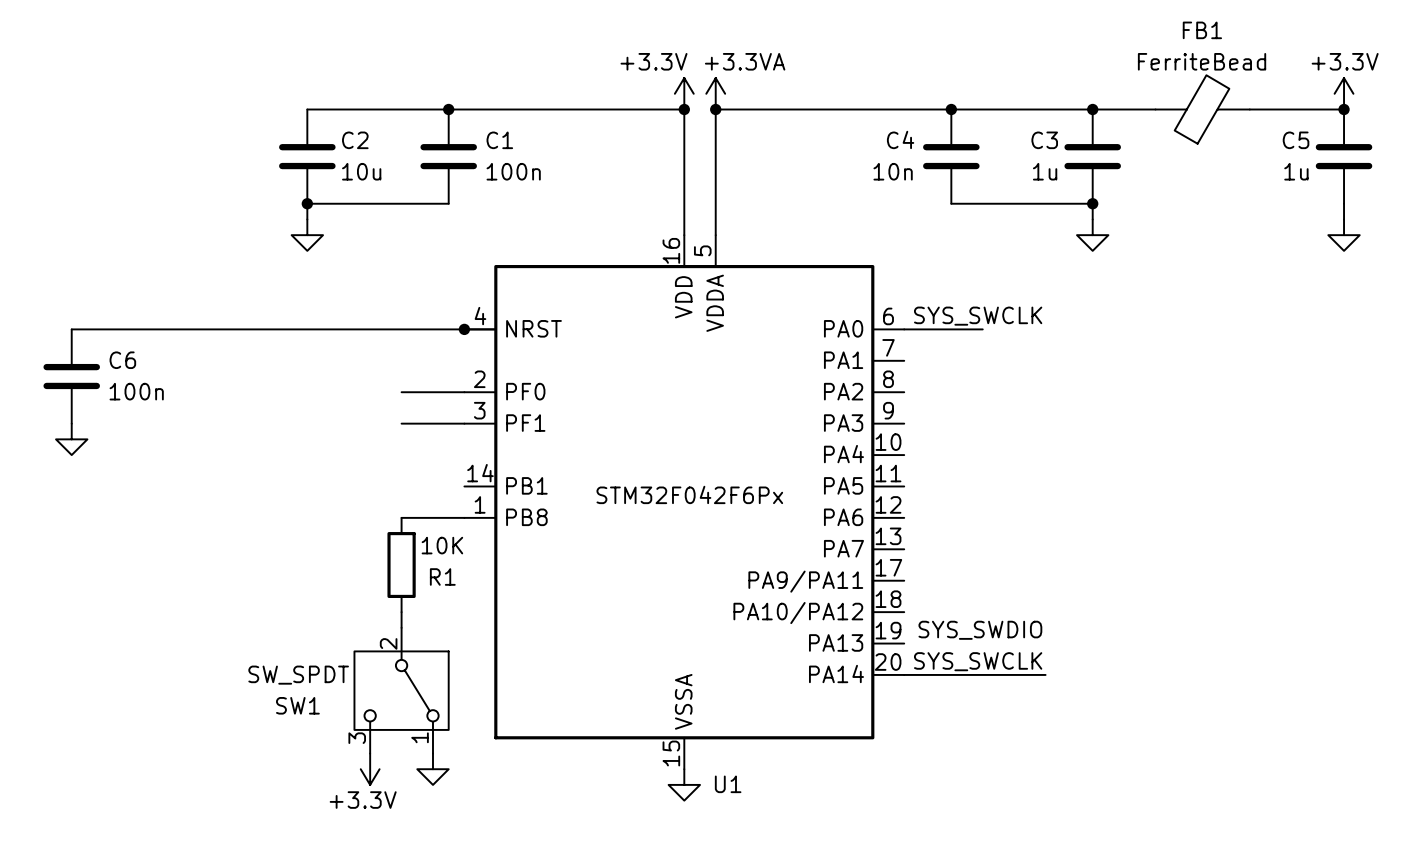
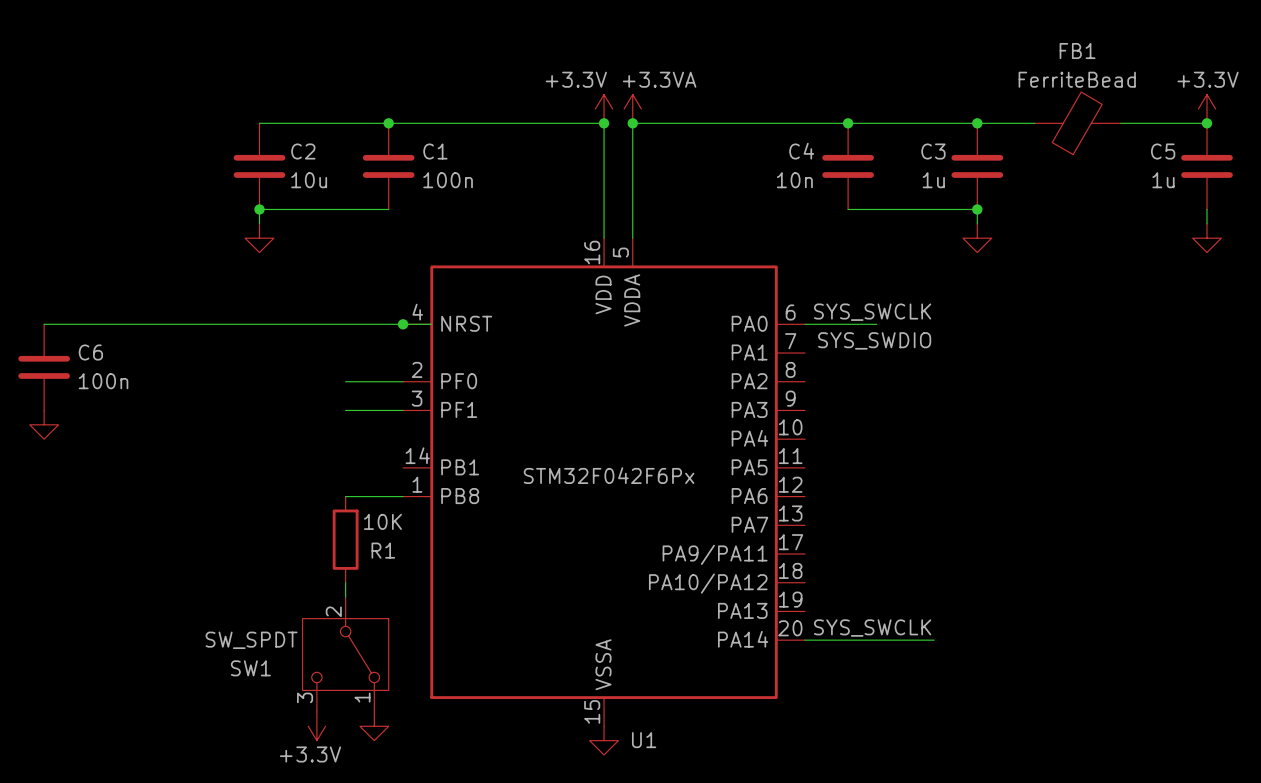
label position: SYS_SWDIO (980, 630) -> SYS_SWDIO (874, 340)

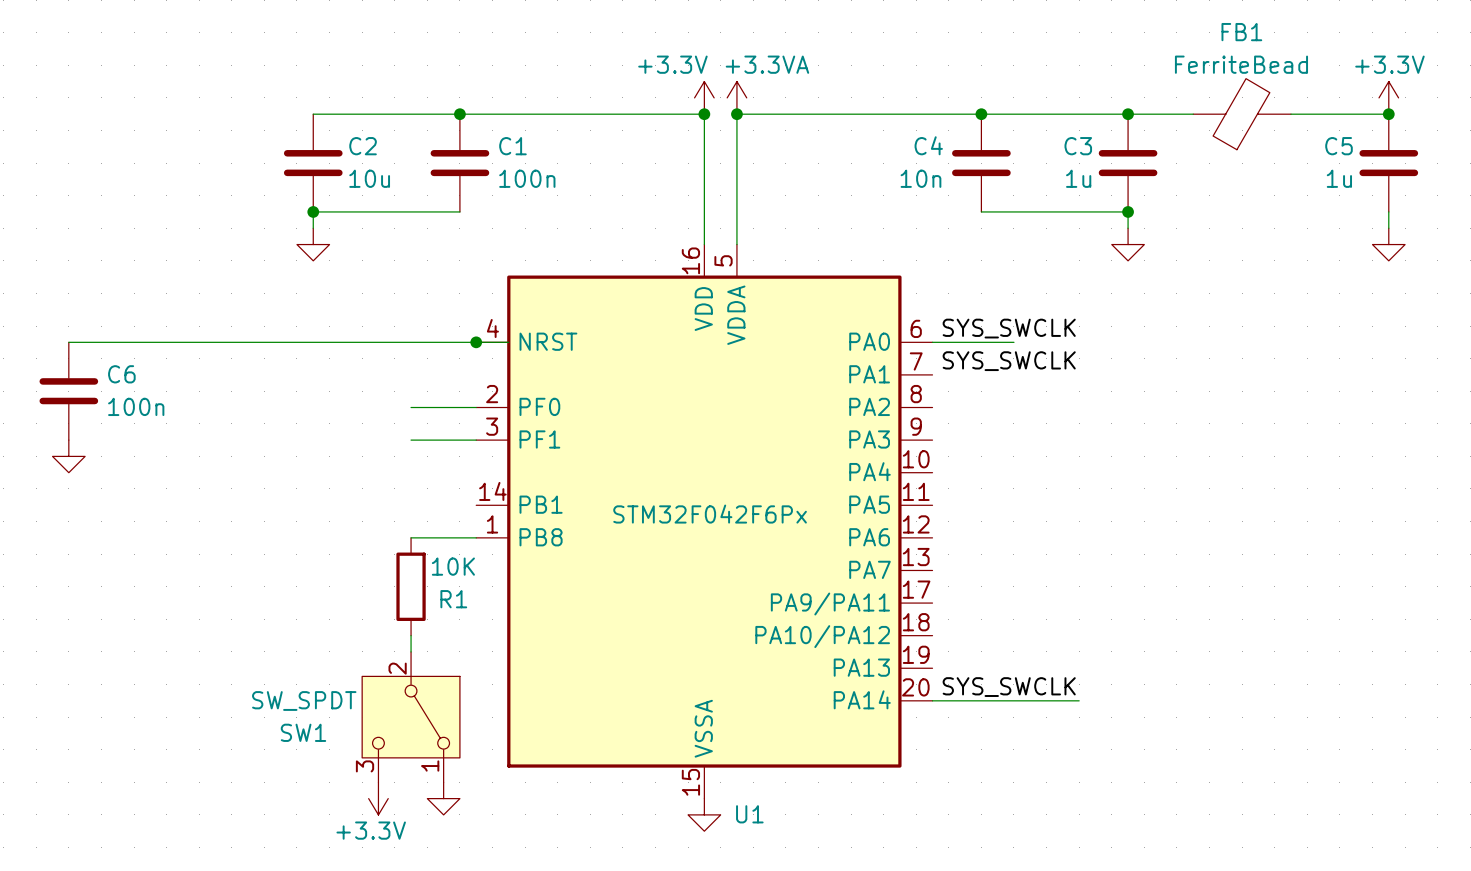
label: SYS_SWDIO (874, 340) -> SYS_SWCLK (1009, 361)

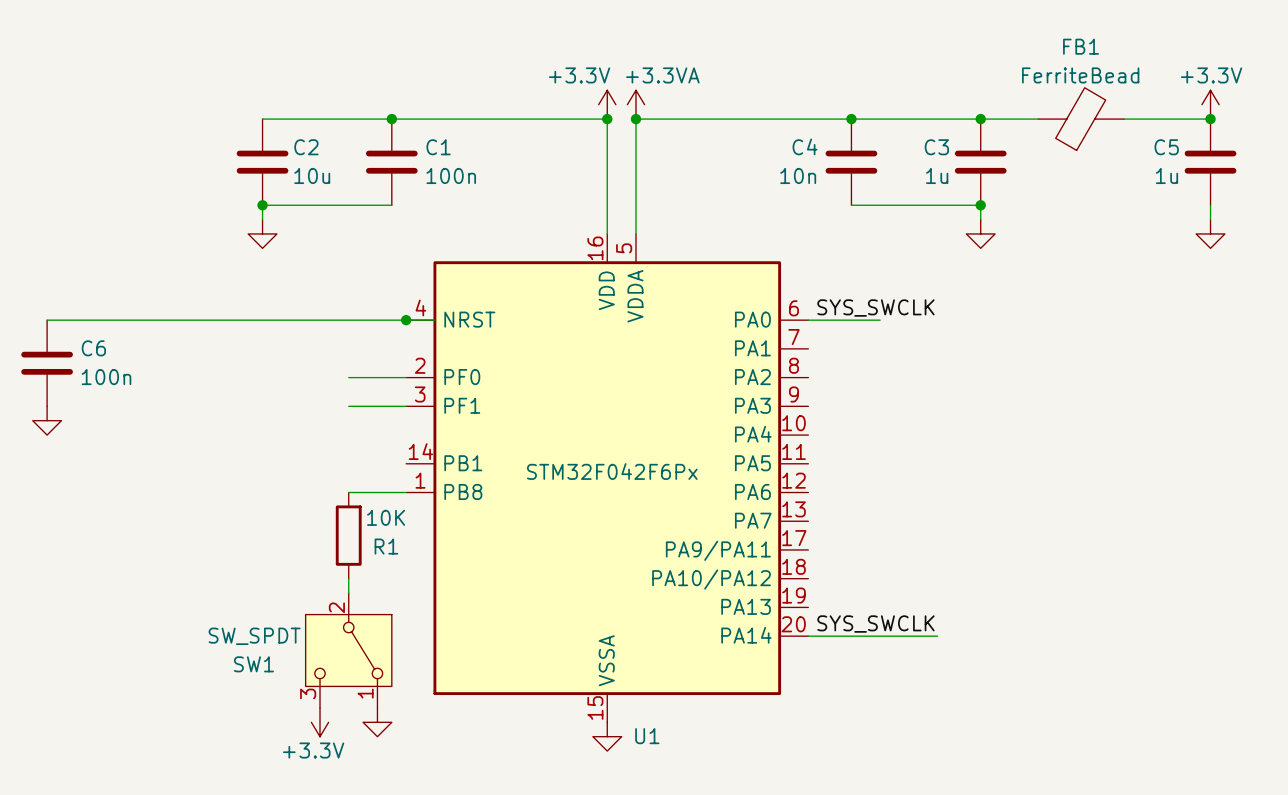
label: SYS_SWCLK (1009, 361) -> none

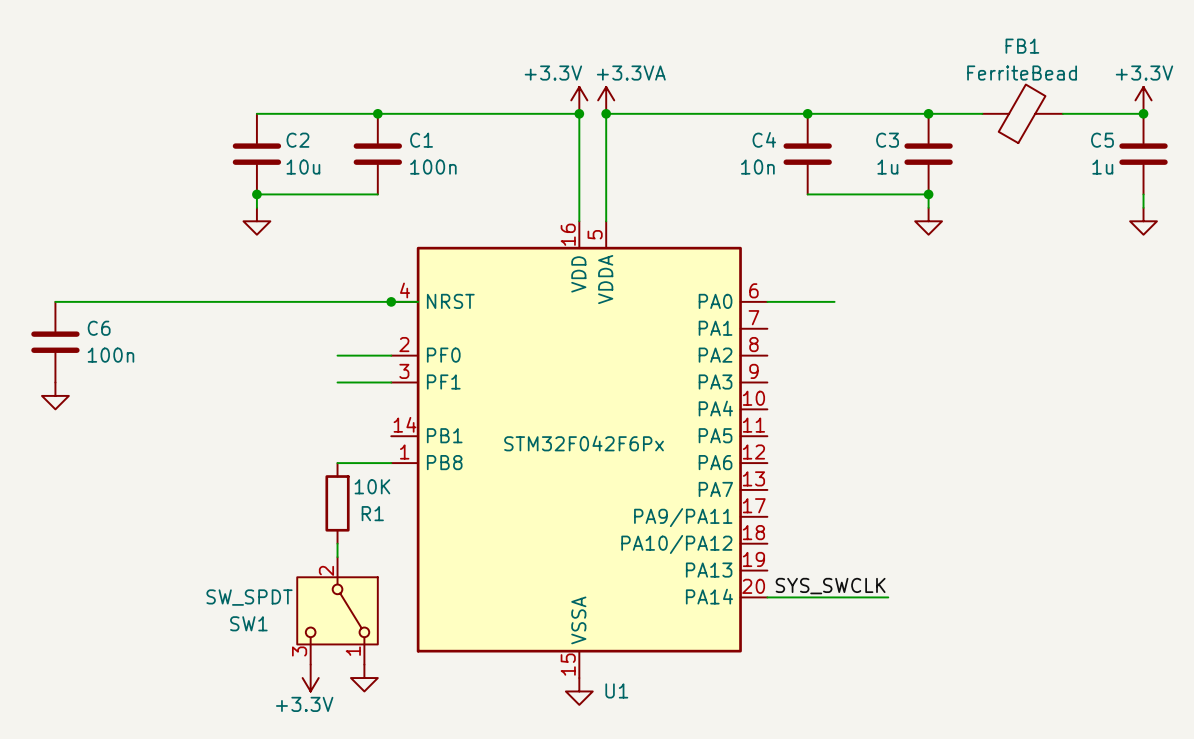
label: SYS_SWCLK (875, 308) -> none

